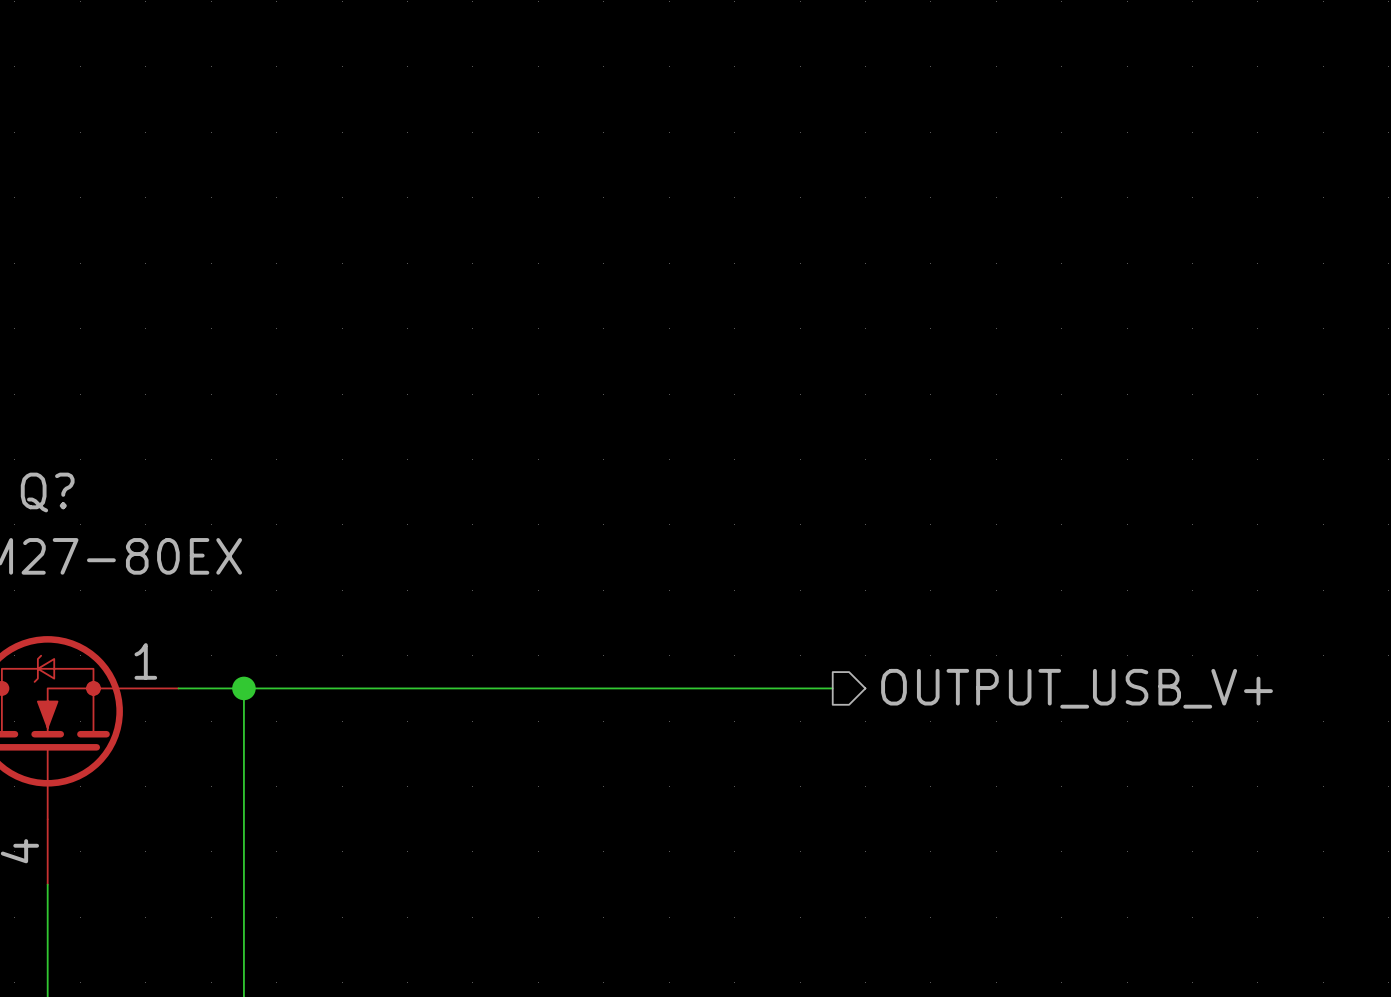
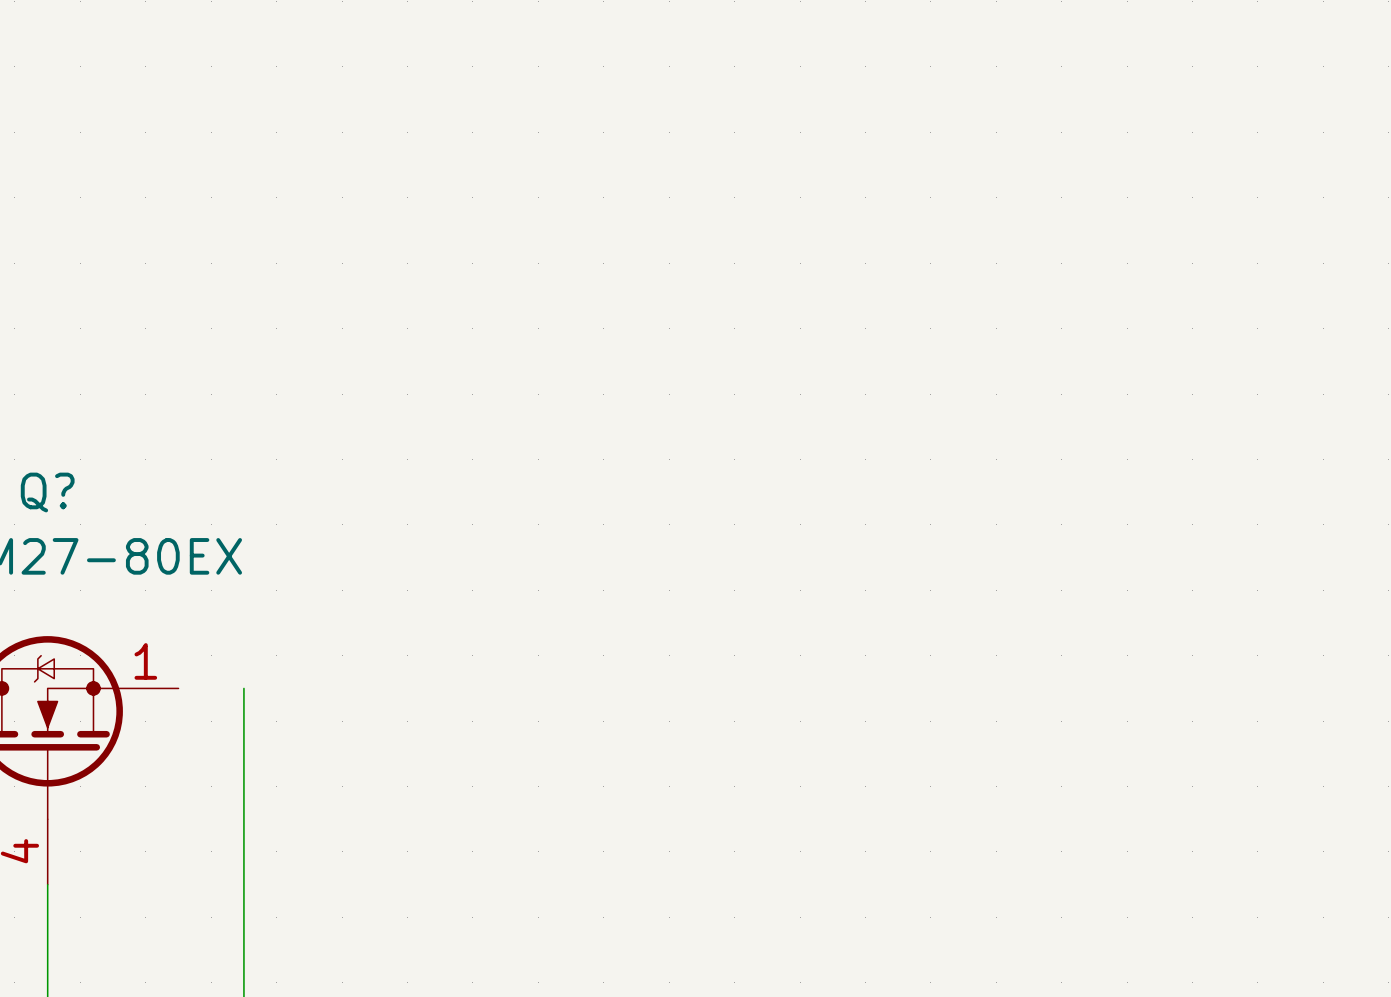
wire: (178, 688) (832, 688) -> none
junction: (243, 688) -> none
hierarchical label: OUTPUT_USB_V+ (1077, 688) -> none

